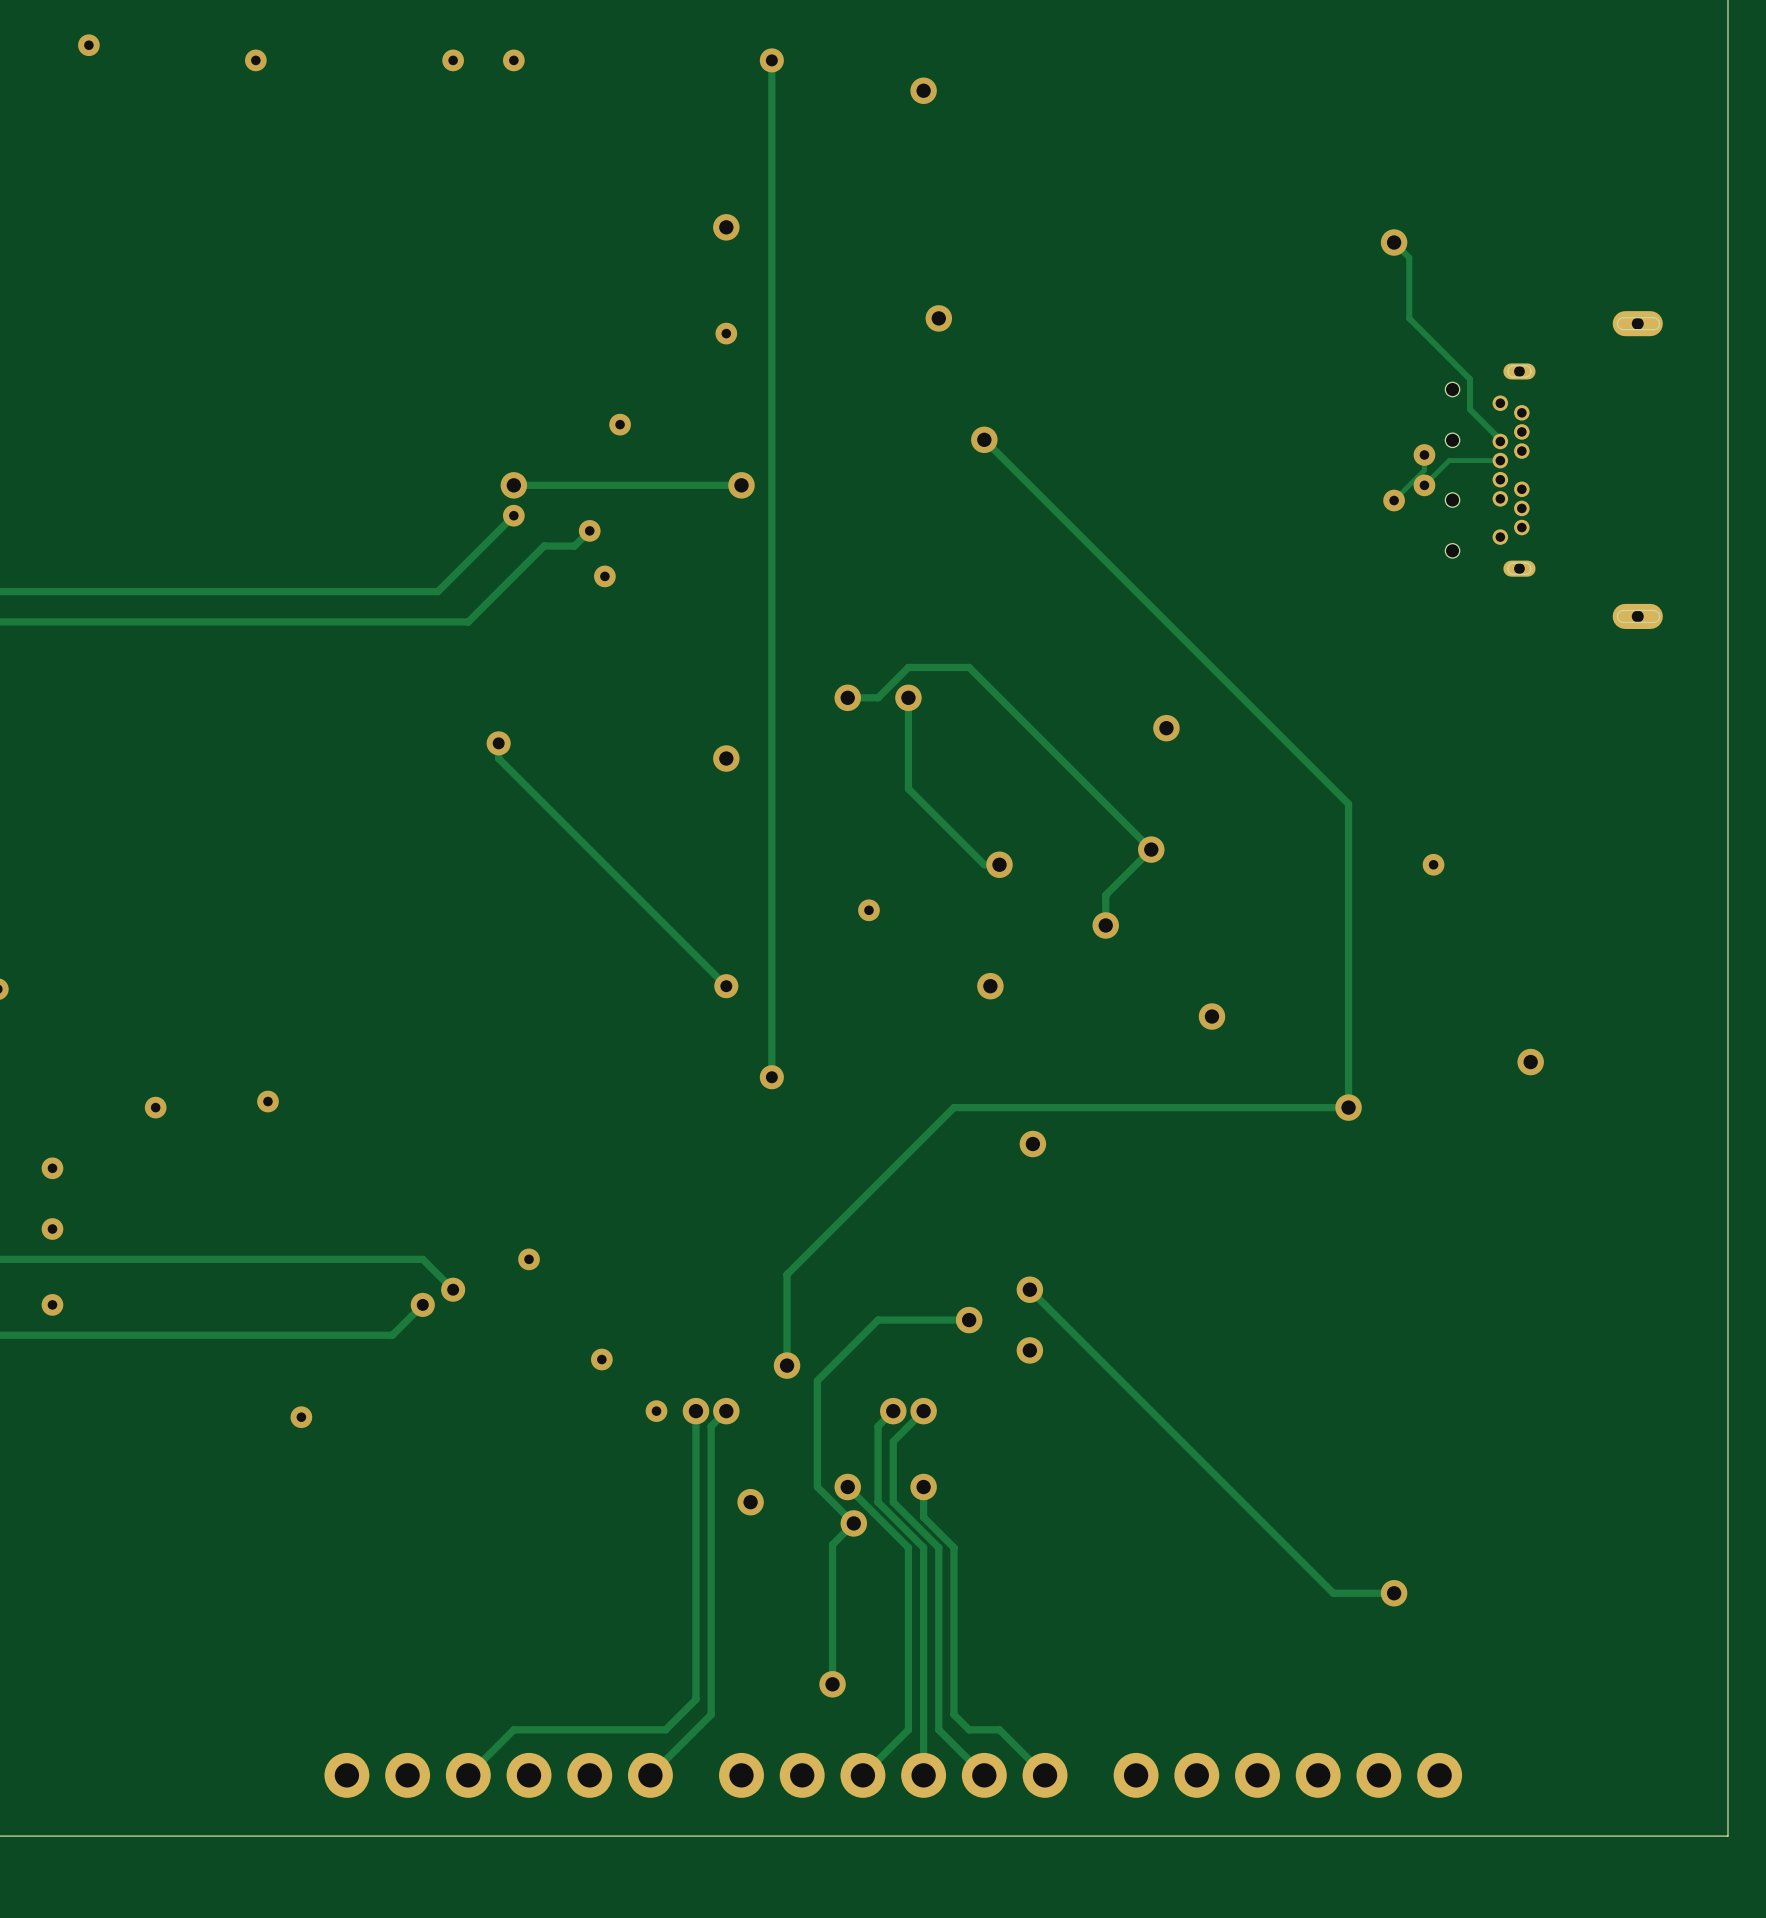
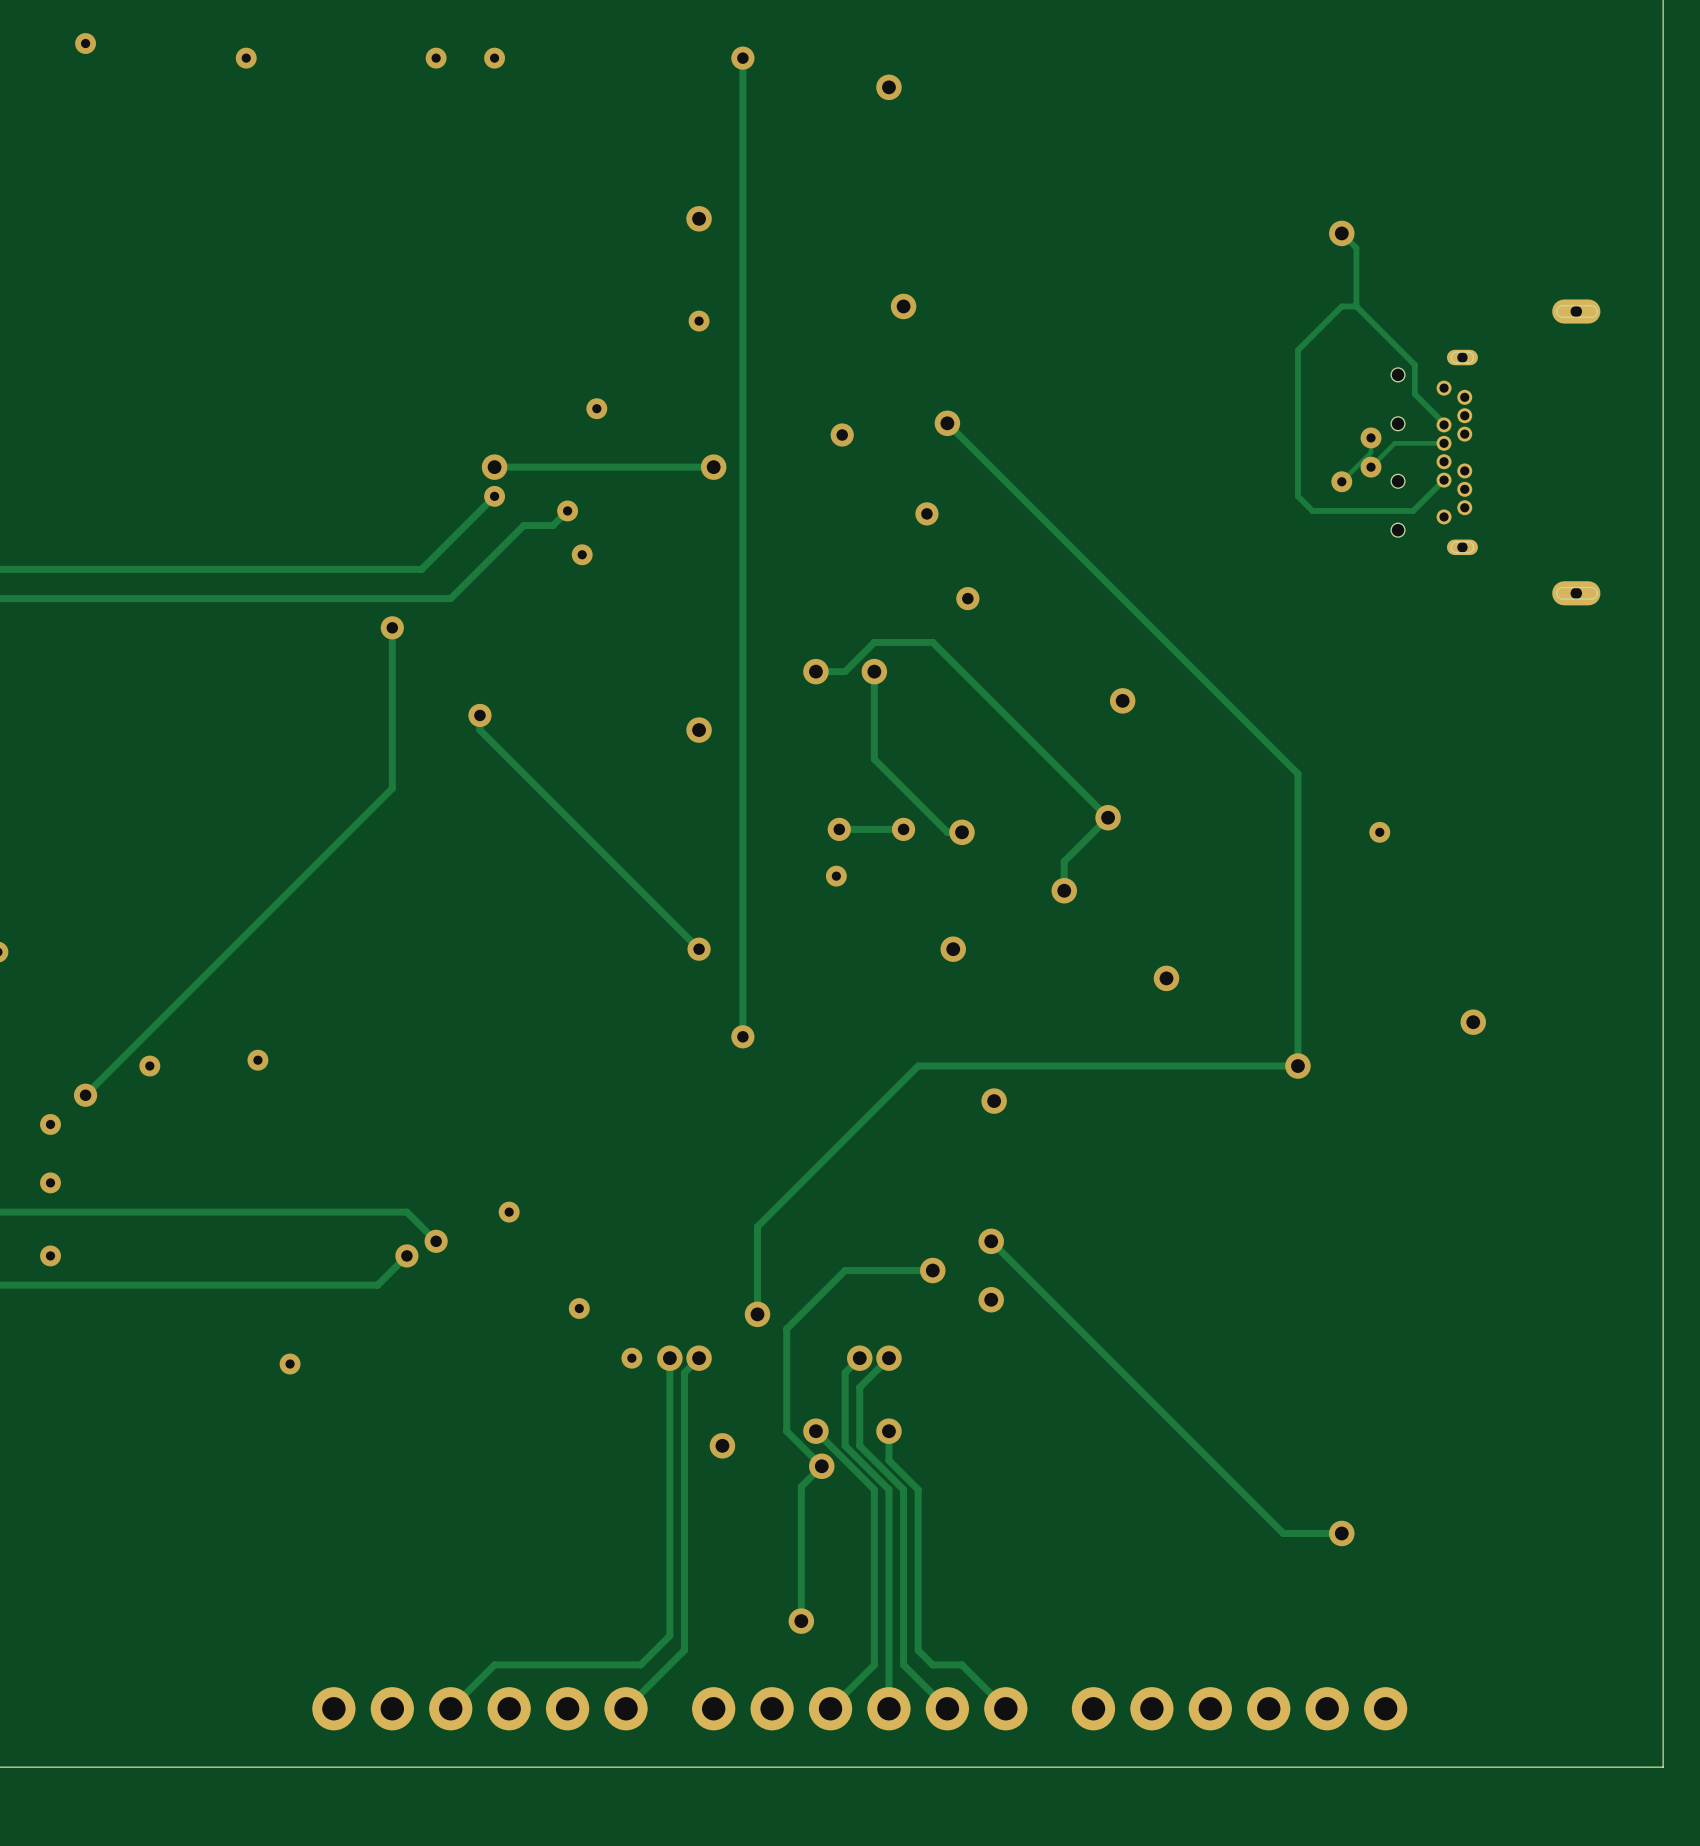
track: none -> (1356, 306) (1341, 306) (1297, 350) (1297, 496) (1312, 510) (1413, 510) (1444, 480)
via: none -> (842, 435)
via: none -> (926, 513)
via: none -> (967, 598)
track: none -> (392, 627) (392, 788) (85, 1095)
via: none -> (392, 627)
via: none -> (839, 829)
track: none -> (903, 829) (839, 829)
via: none -> (903, 829)
via: none -> (85, 1095)

